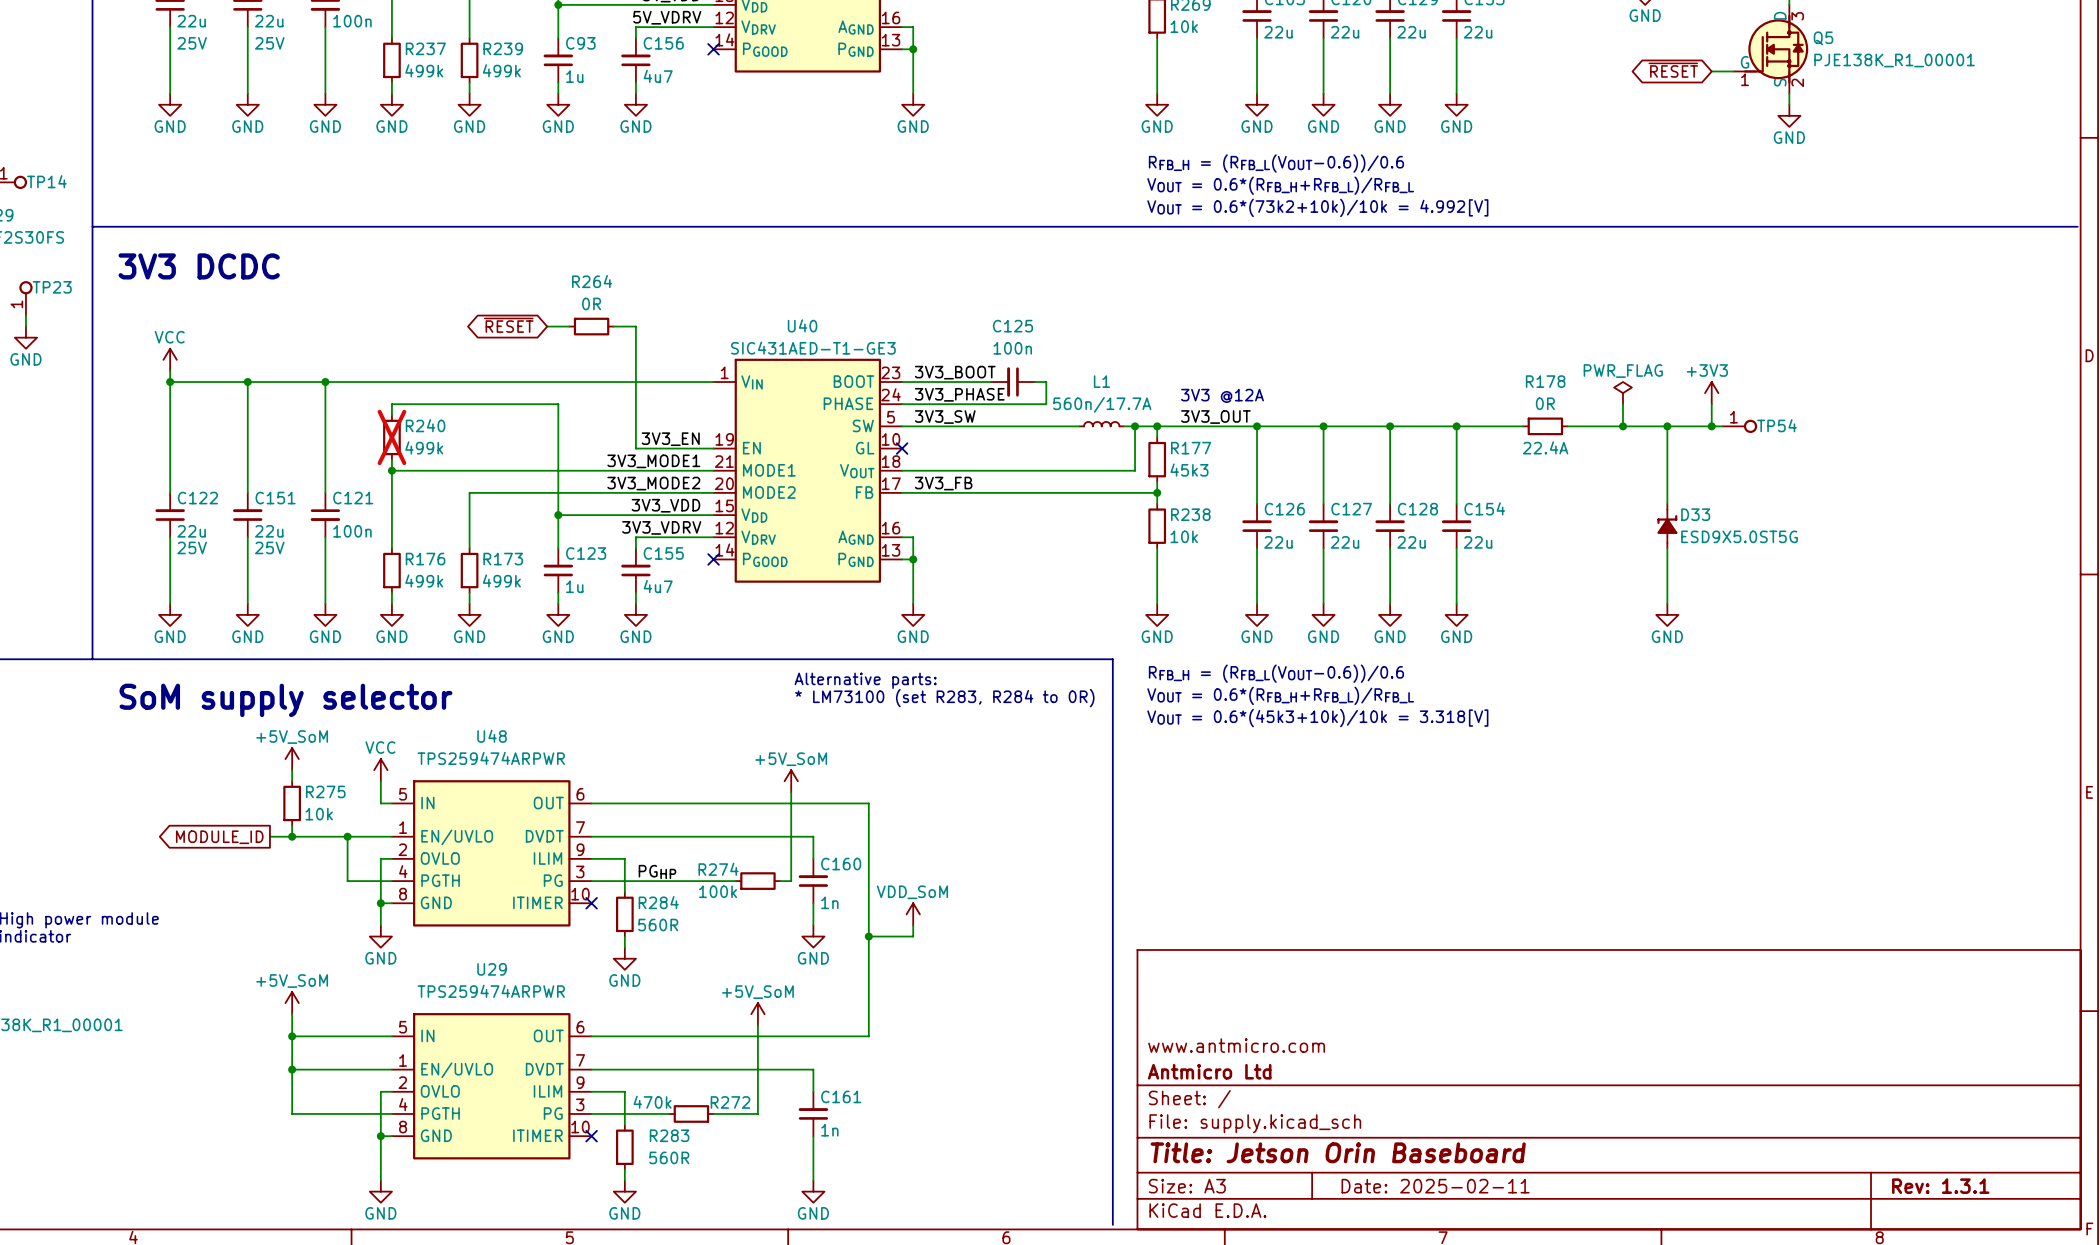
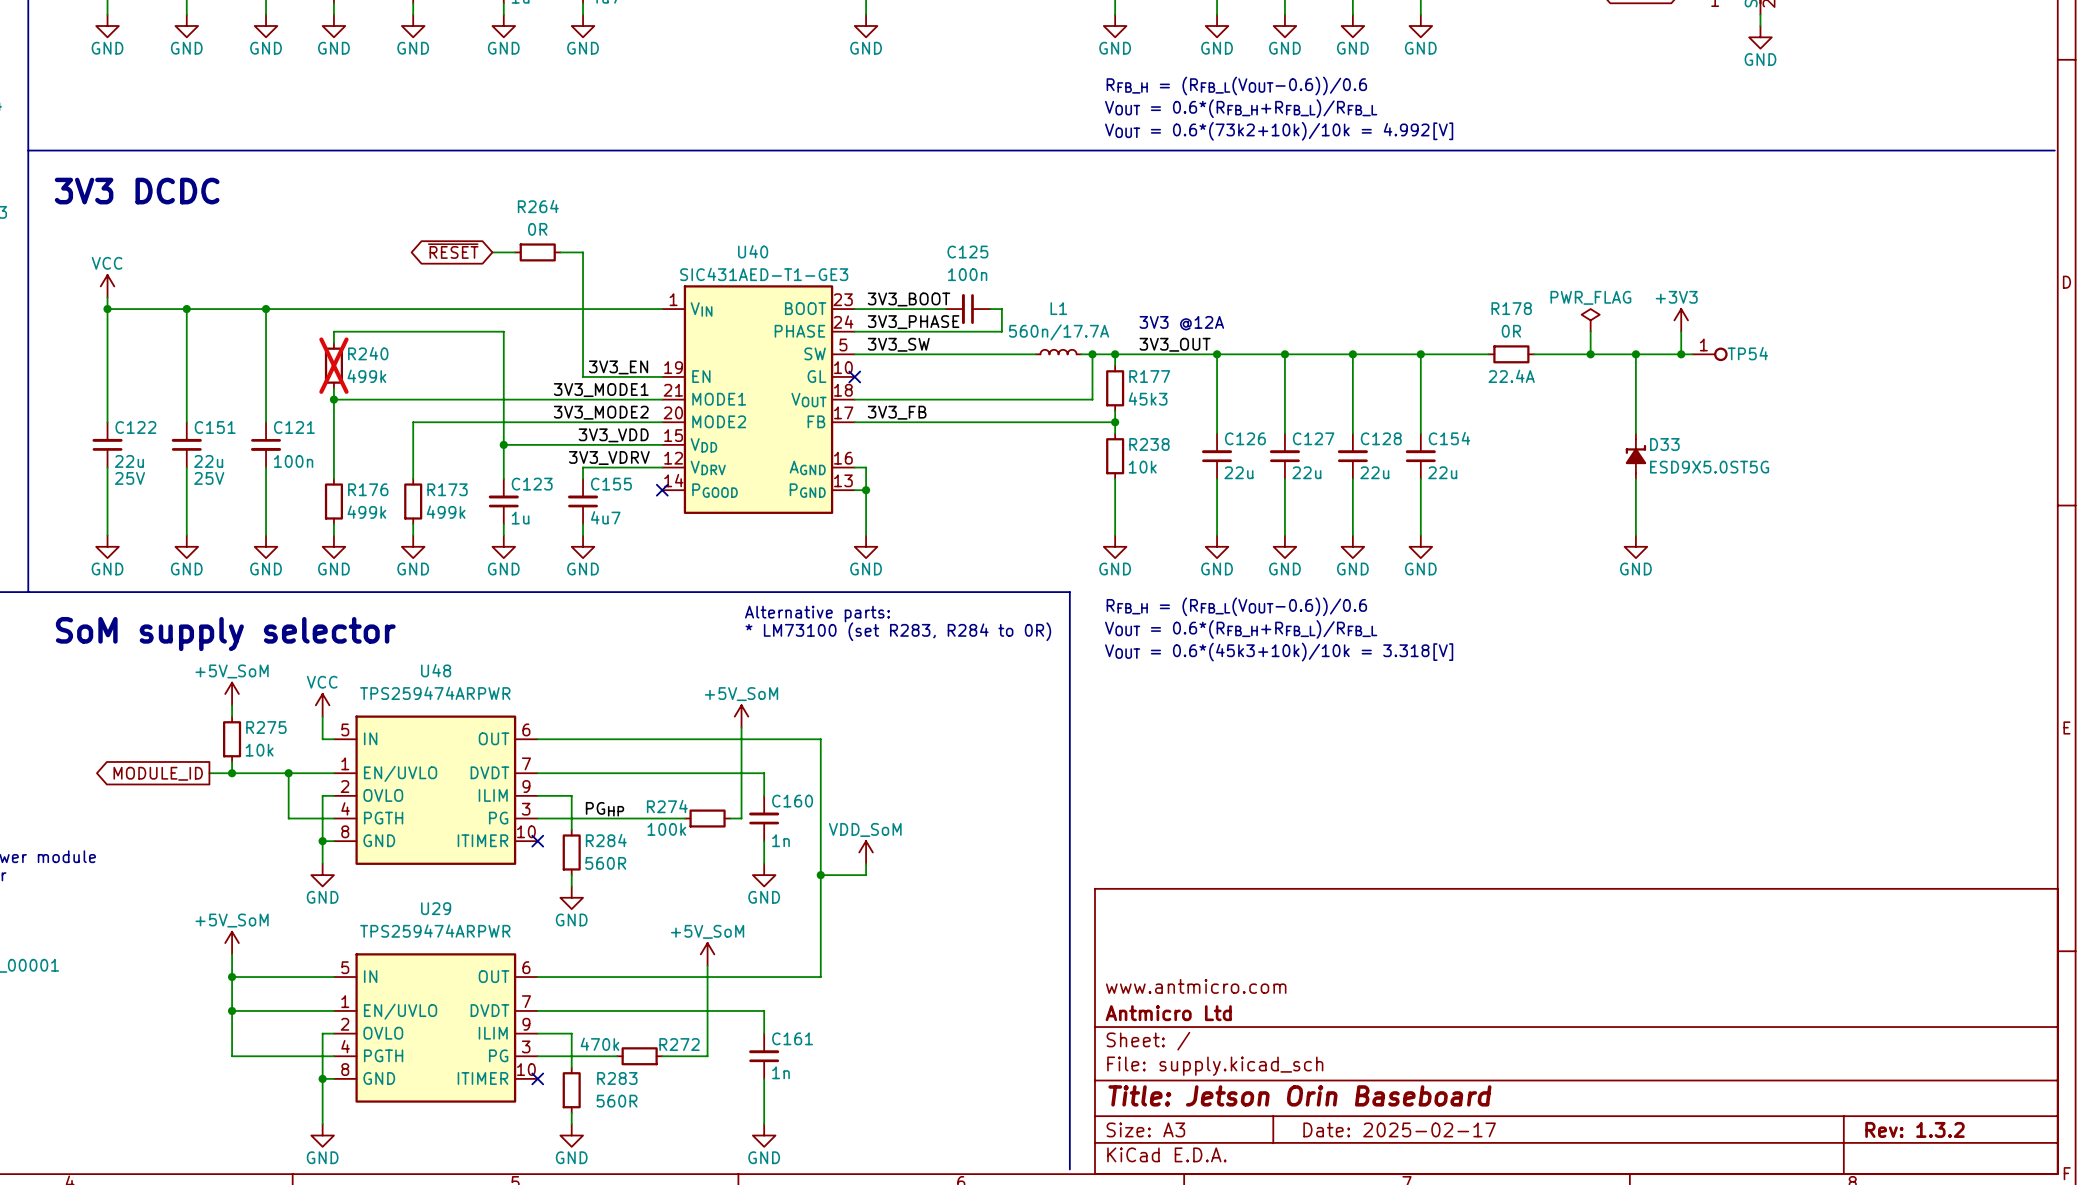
title block: Date: 2025-02-11 (1435, 1186) -> Date: 2025-02-17 (1399, 1129)
title block: Rev: 1.3.1 (1940, 1186) -> Rev: 1.3.2 (1914, 1129)

